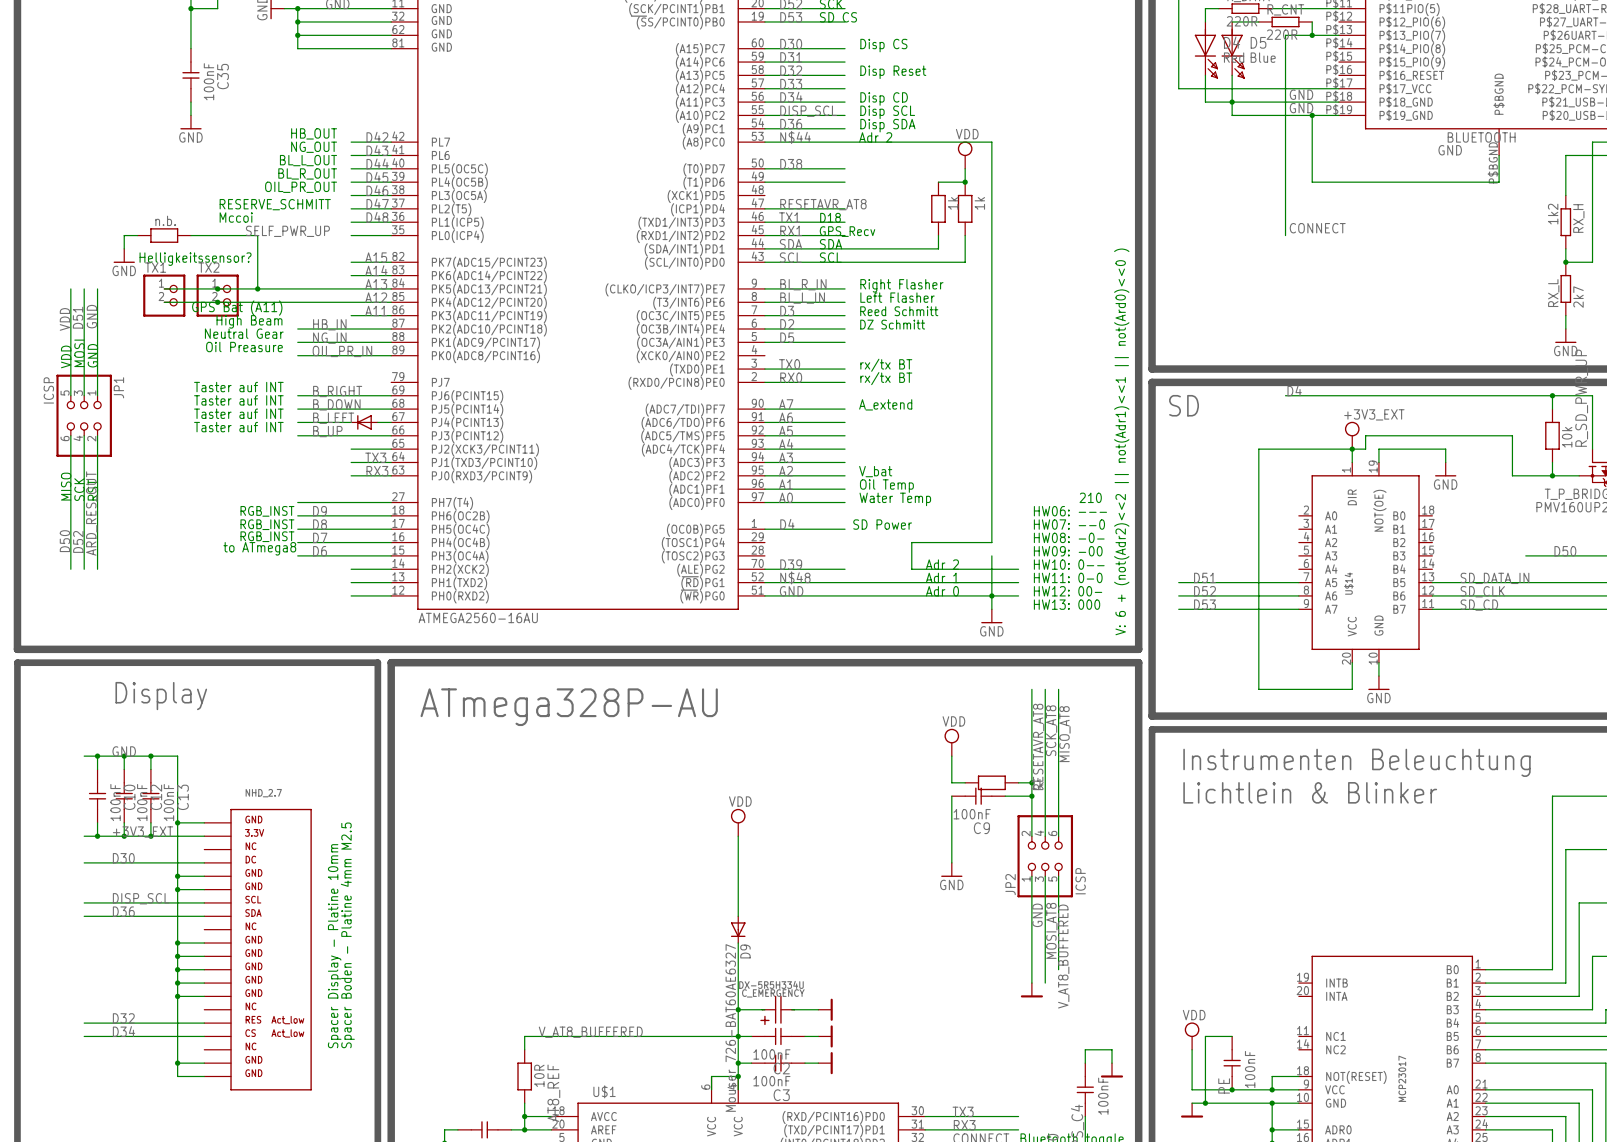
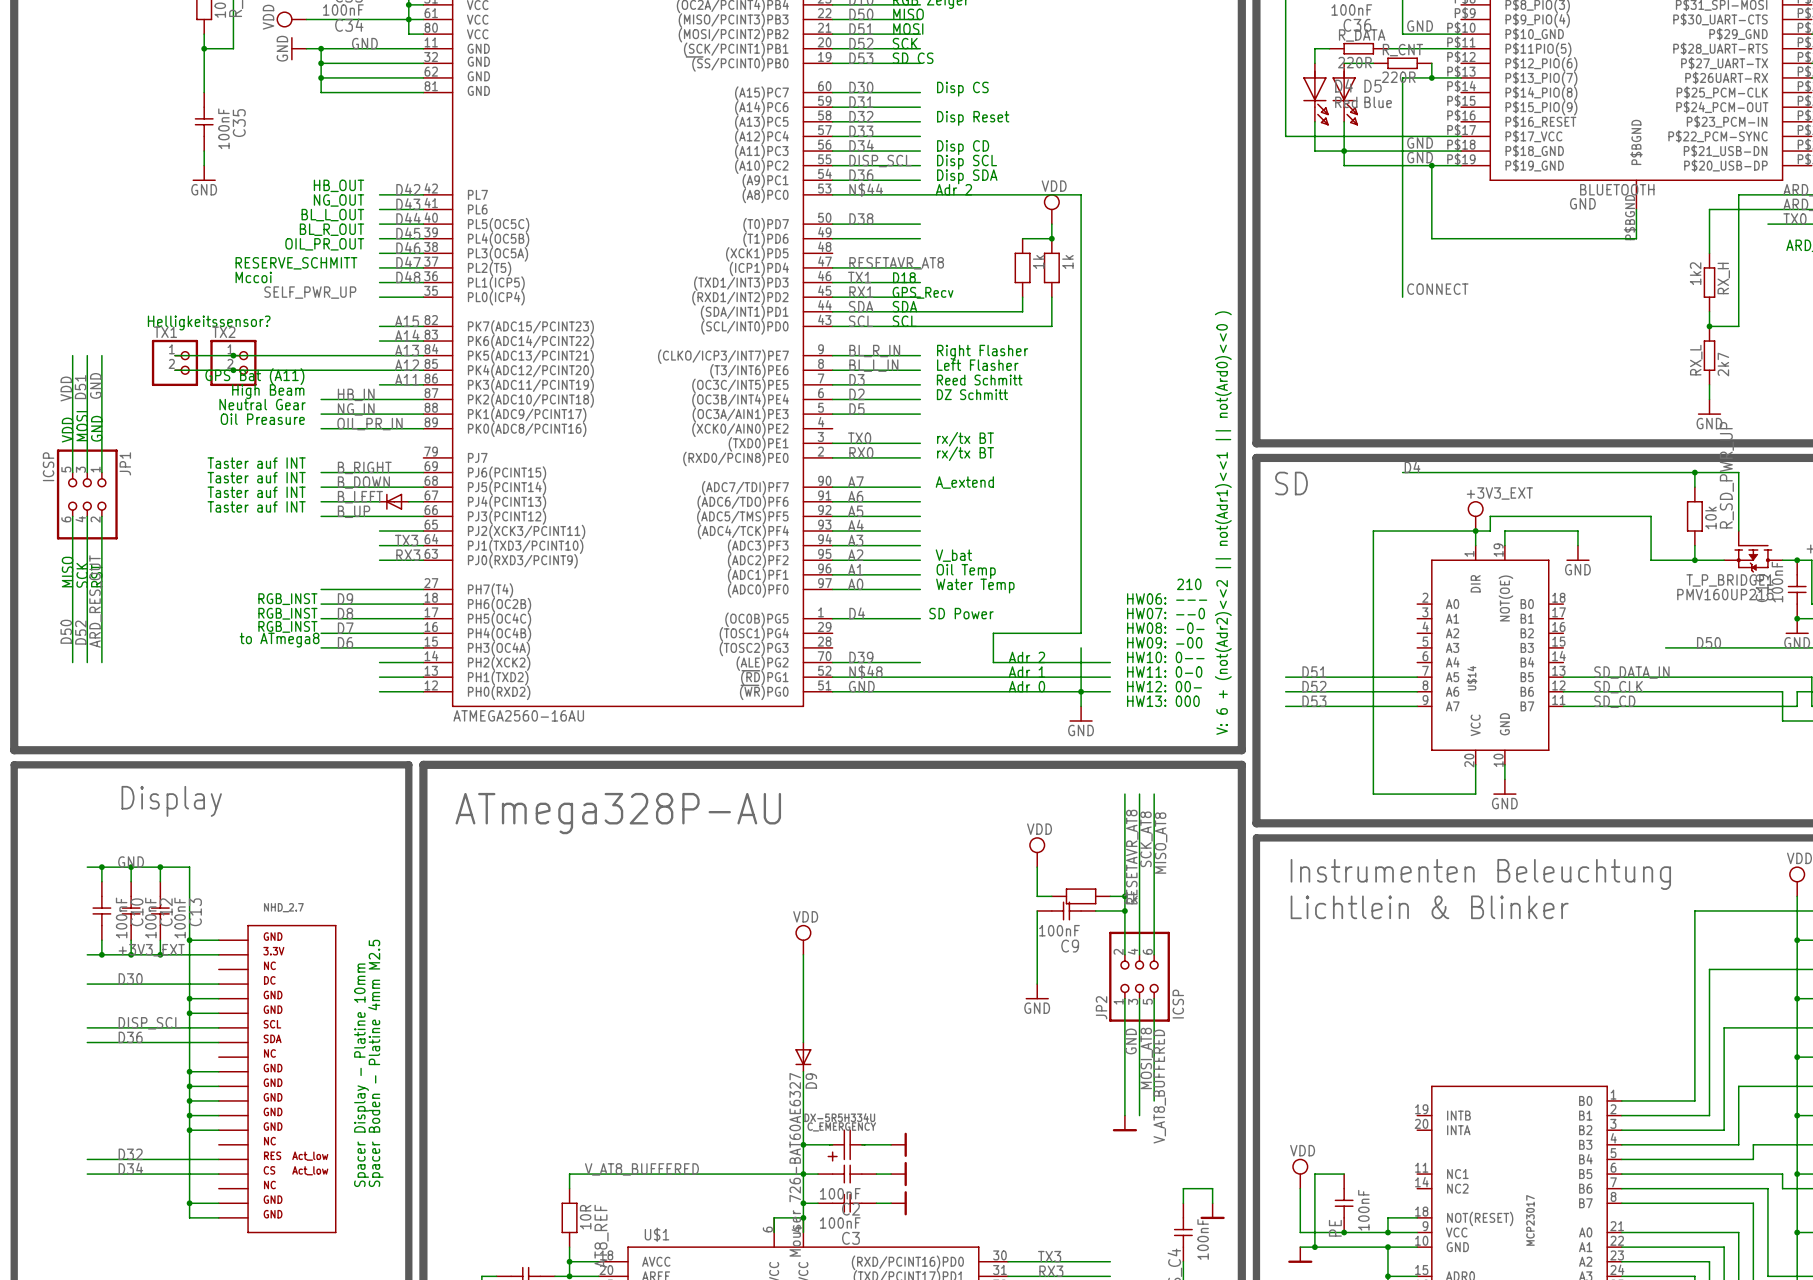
wire: (137, 235) (124, 235) (124, 248) -> none
part: n.b. (164, 235) -> none
wire: (190, 235) (257, 235) (257, 288) -> none
power symbol: GND (124, 255) -> none
junction: (257, 288) -> none

